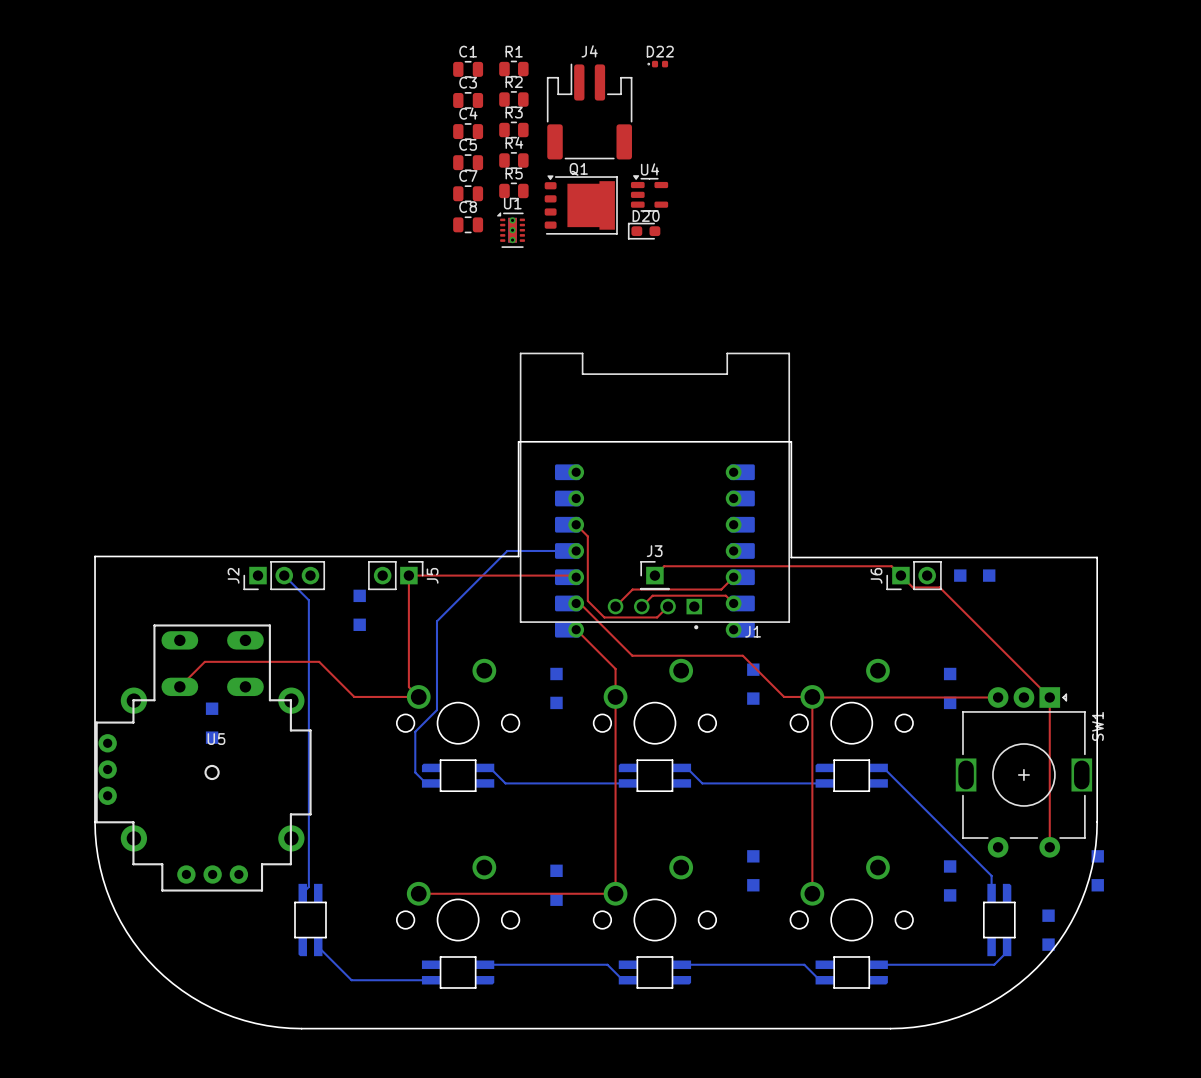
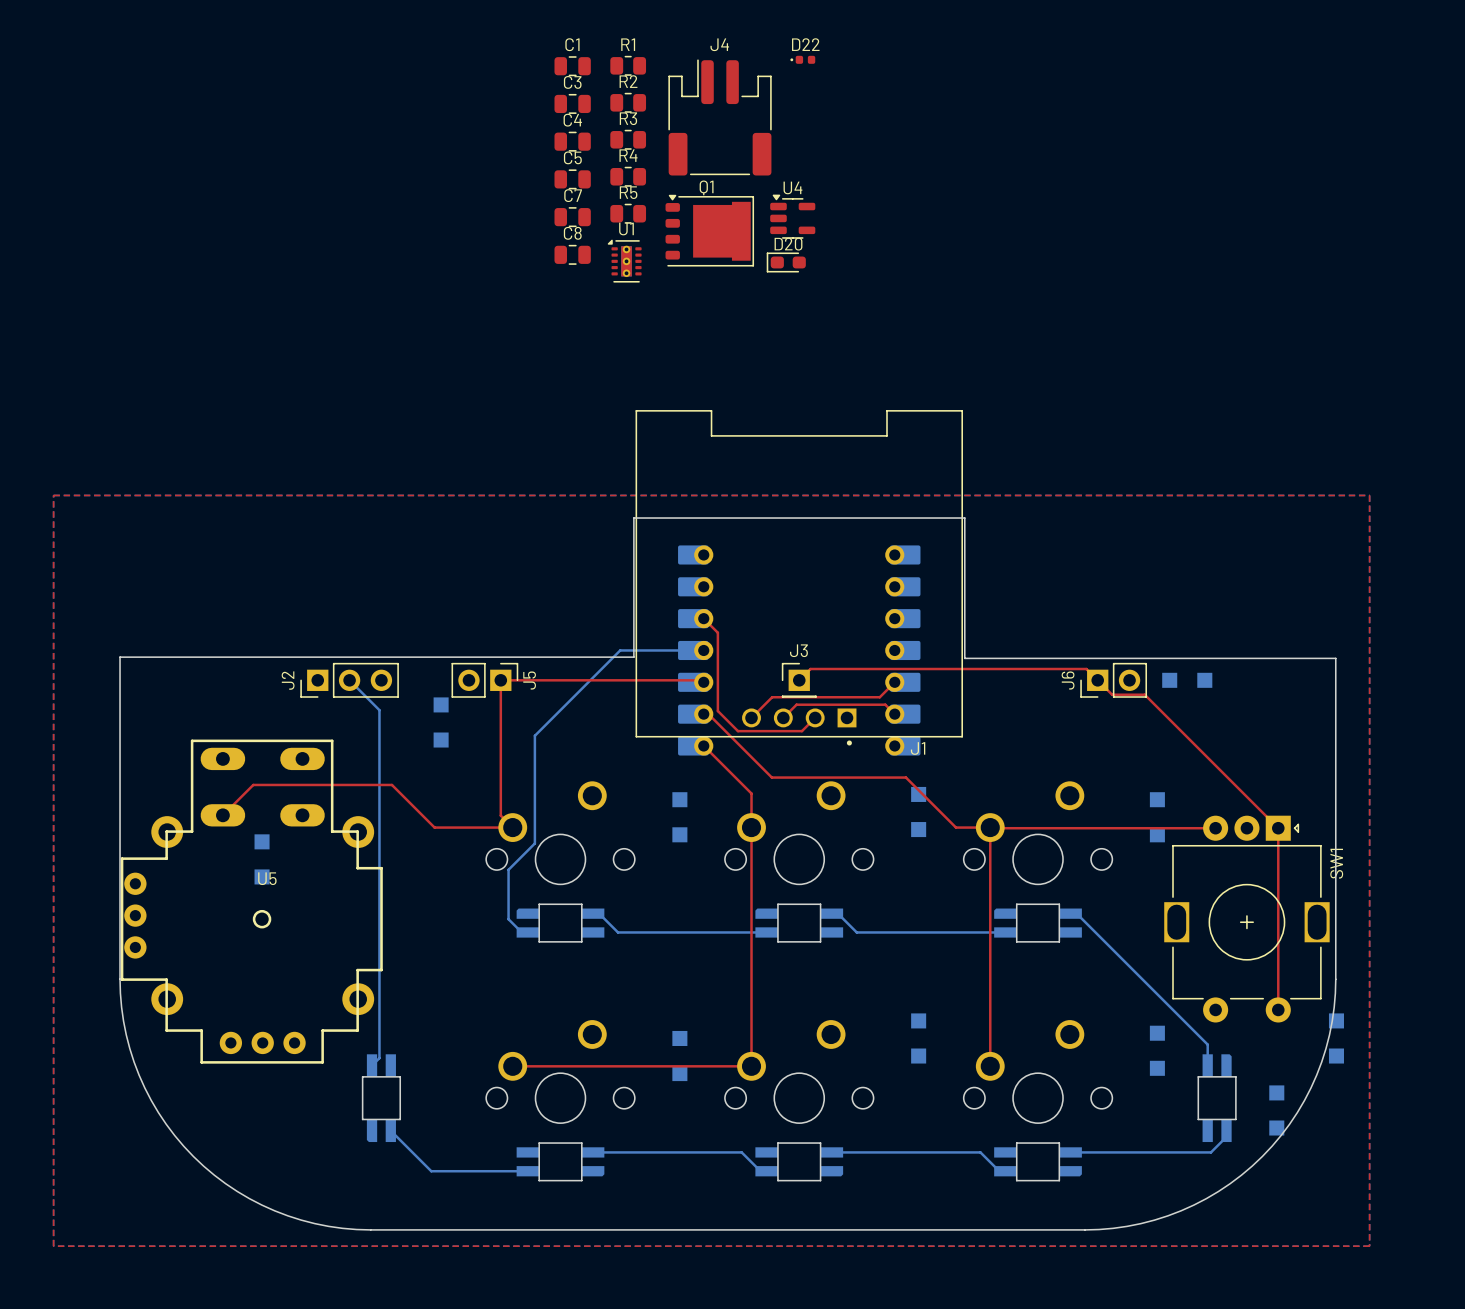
top zone outline: none -> (53, 495) (1369, 495) (1369, 1246) (53, 1246) (53, 495)

